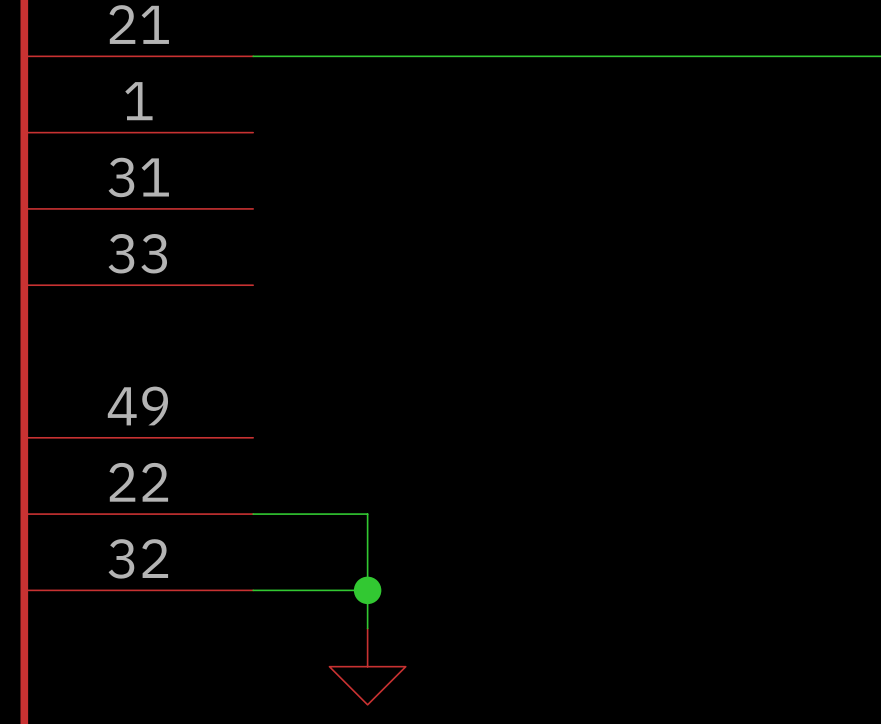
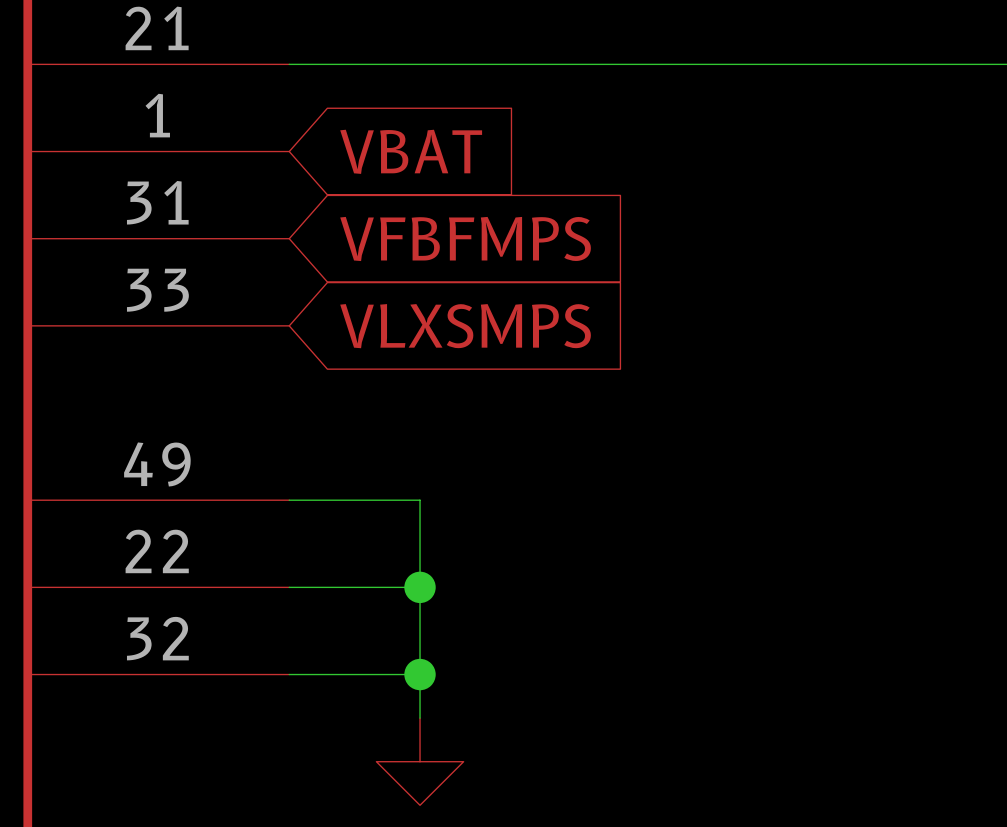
global label: none -> VBAT (411, 151)
global label: none -> VFBFMPS (465, 238)
global label: none -> VLXSMPS (465, 326)
wire: none -> (289, 500) (420, 500) (420, 587)
junction: none -> (420, 587)

